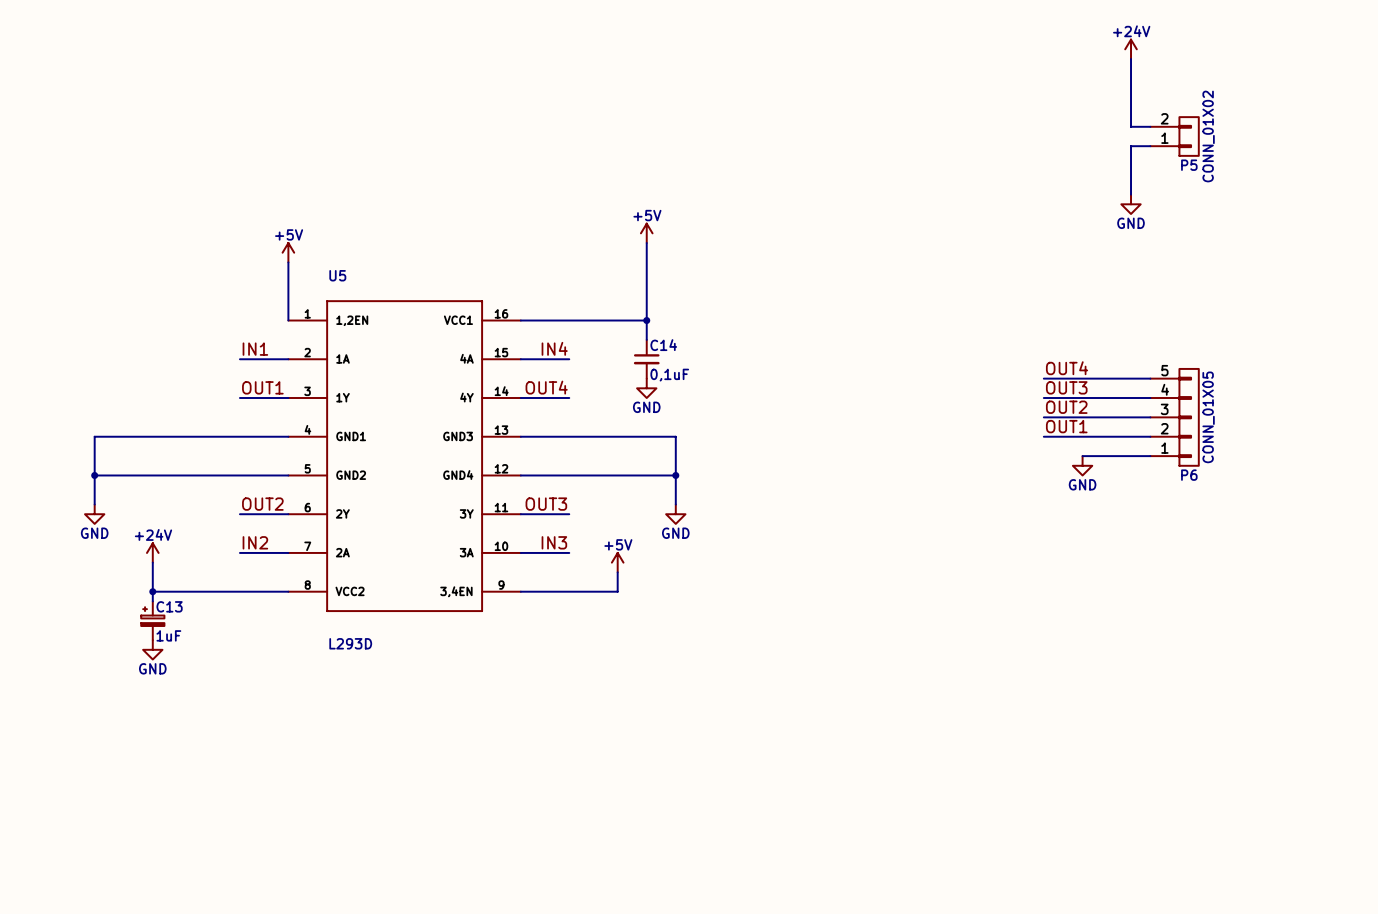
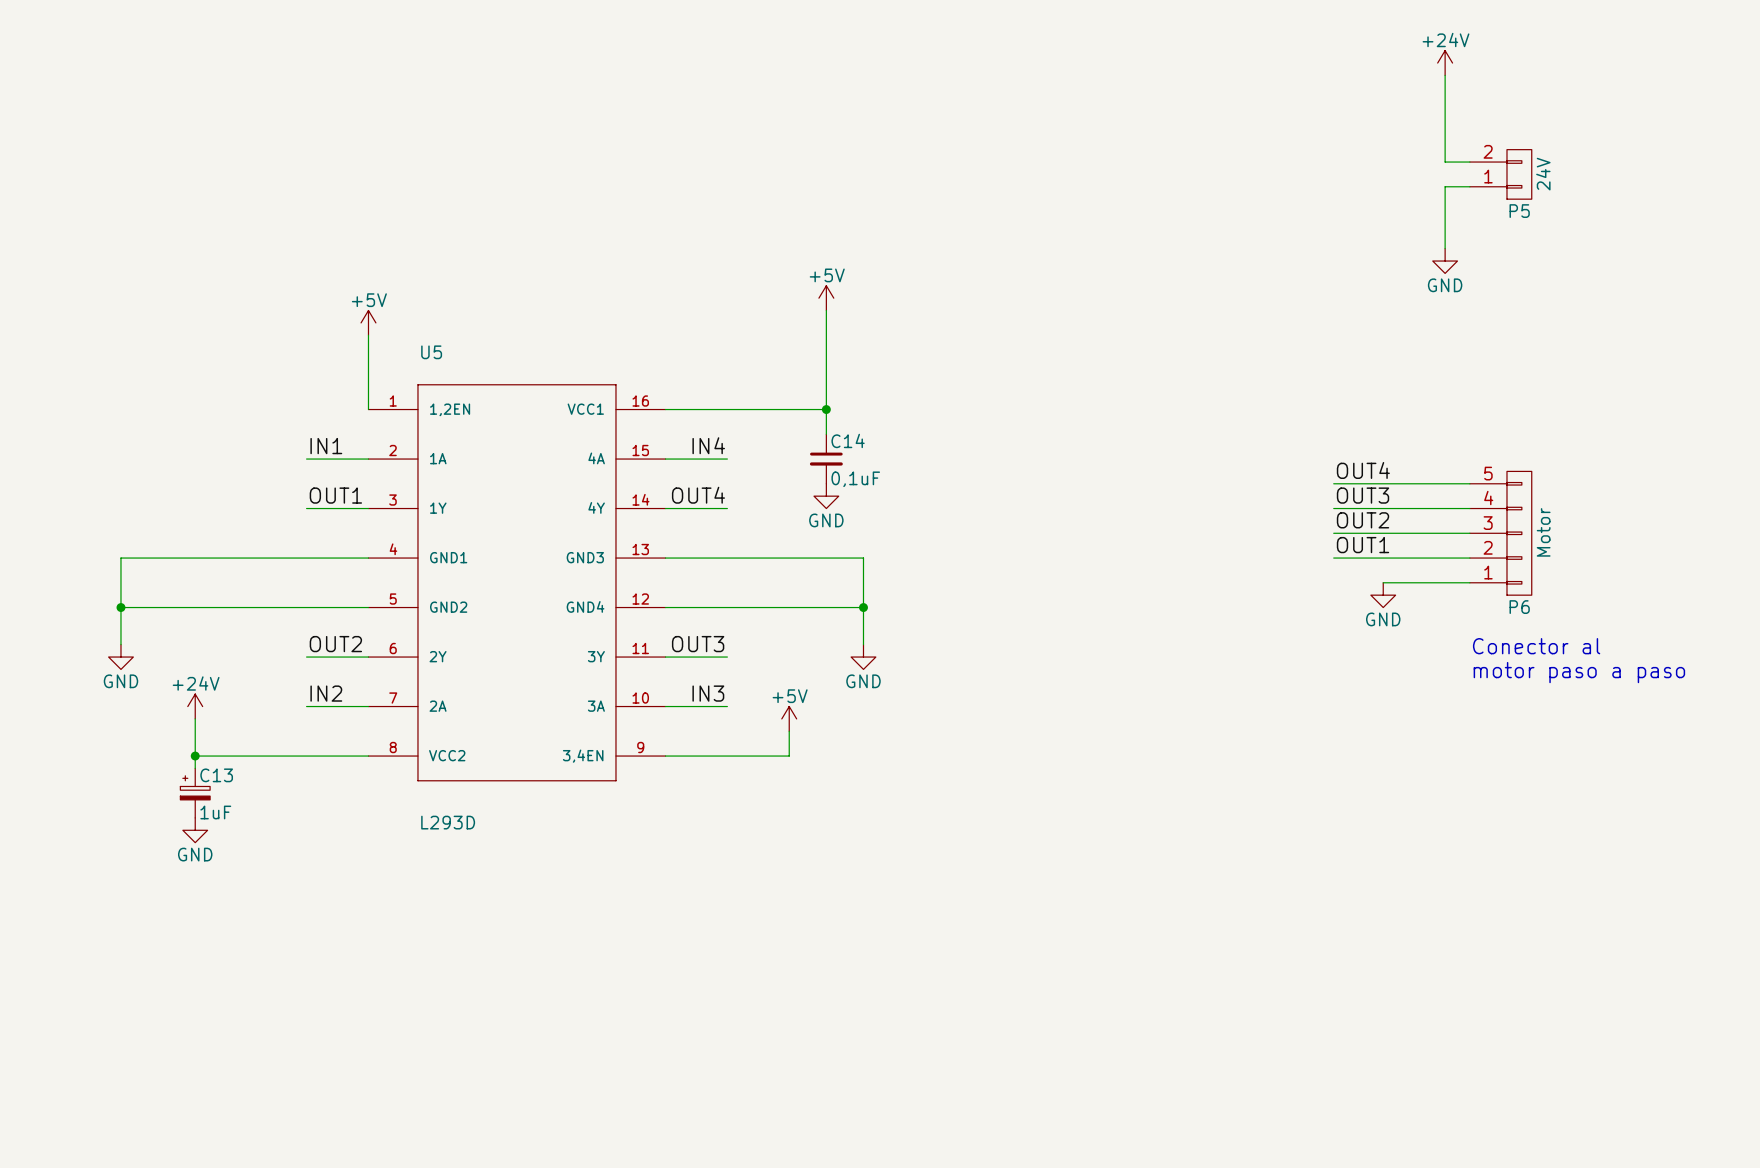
P5 value: CONN_01X02 (1208, 136) -> 24V (1543, 174)
P6 value: CONN_01X05 (1208, 417) -> Motor (1543, 532)
text: none -> Conector al (1536, 646)
text: none -> motor paso a paso (1579, 672)

